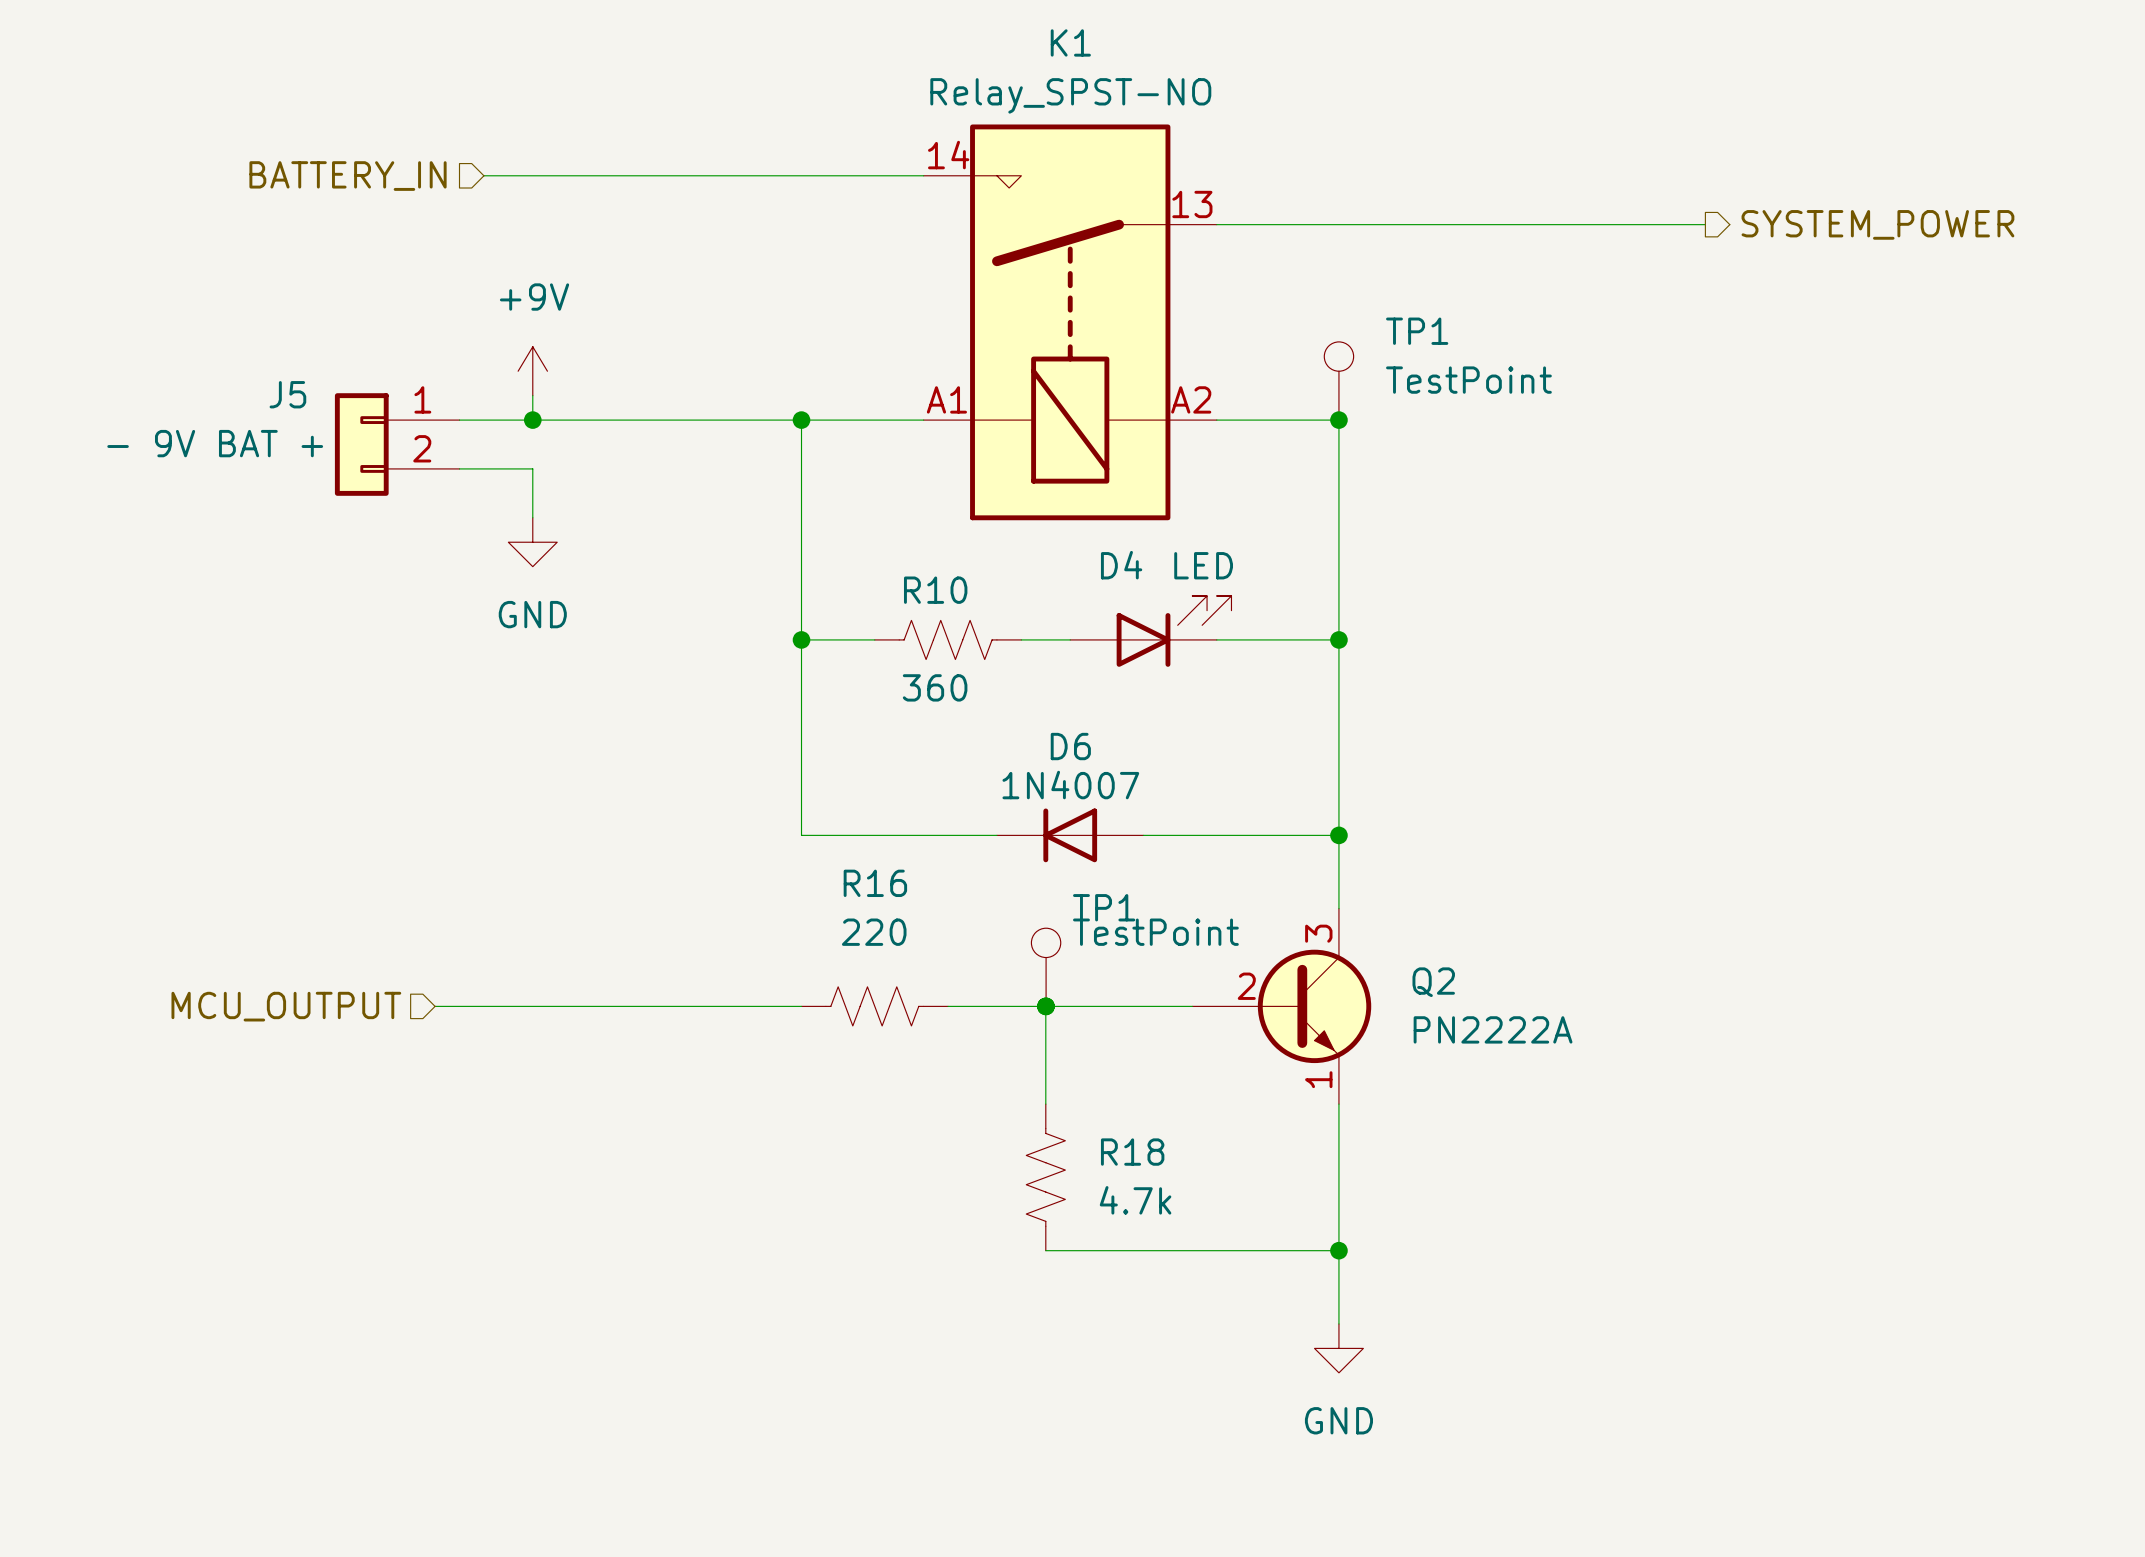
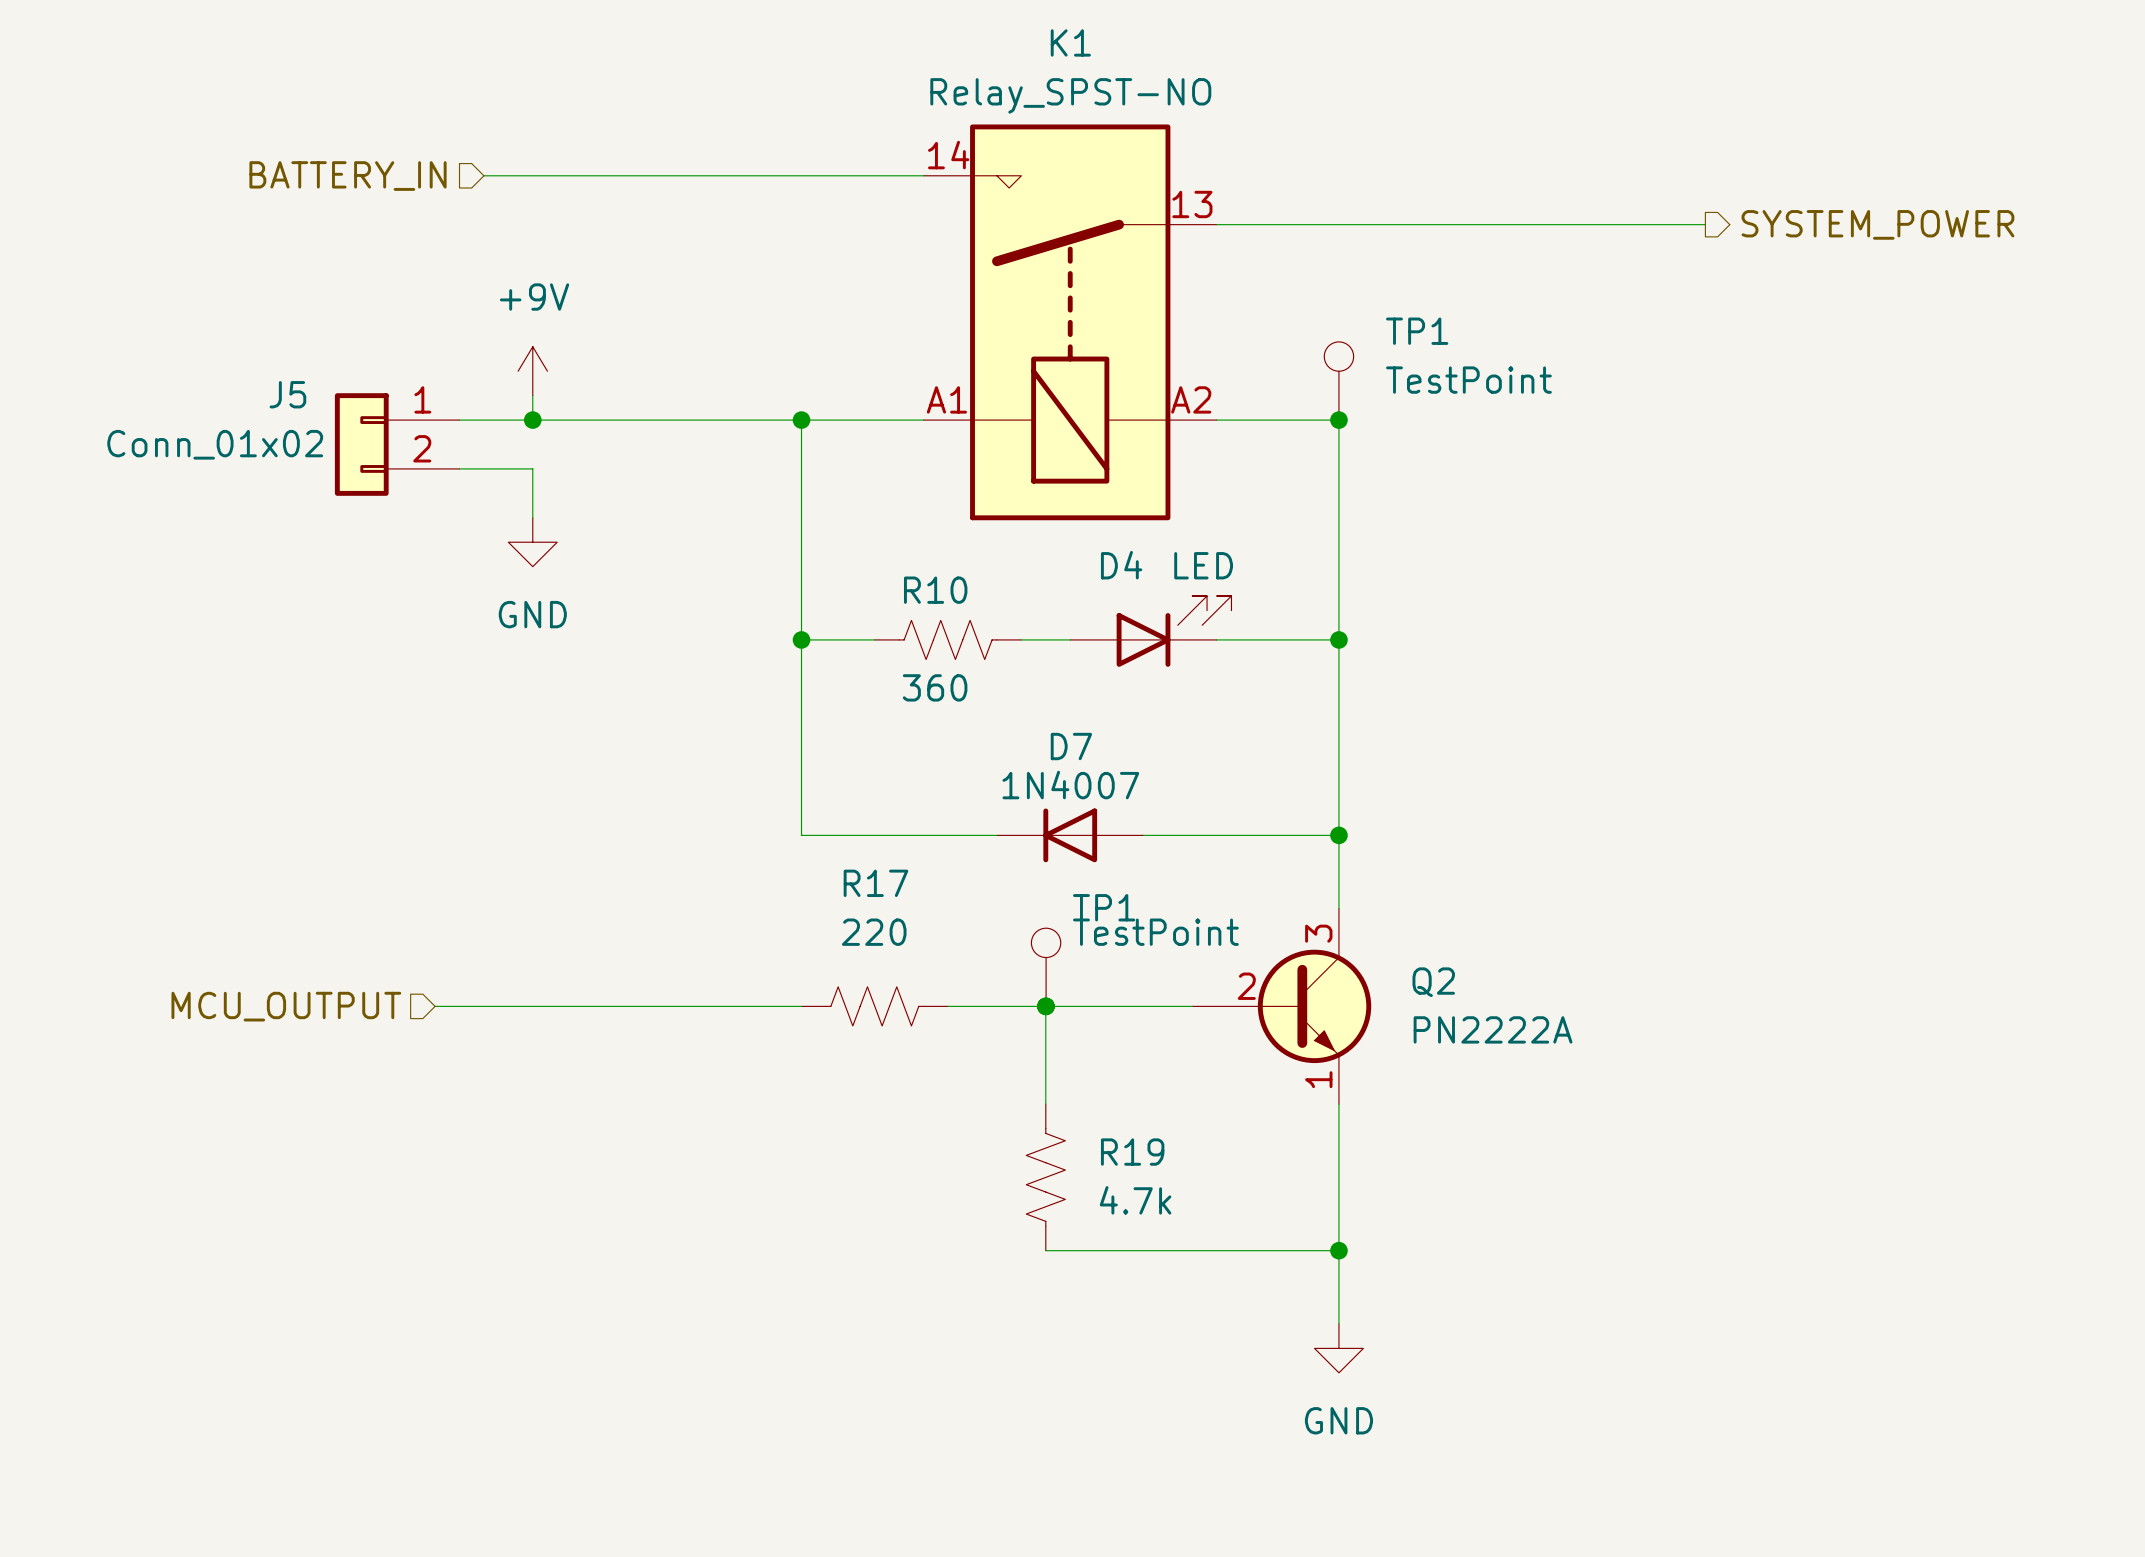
J5 value: - 9V BAT + (215, 443) -> Conn_01x02 (215, 444)
D6 name: D6 (1070, 746) -> D7 (1071, 746)
R16 name: R16 (875, 883) -> R17 (875, 883)
R18 name: R18 (1132, 1152) -> R19 (1132, 1152)

